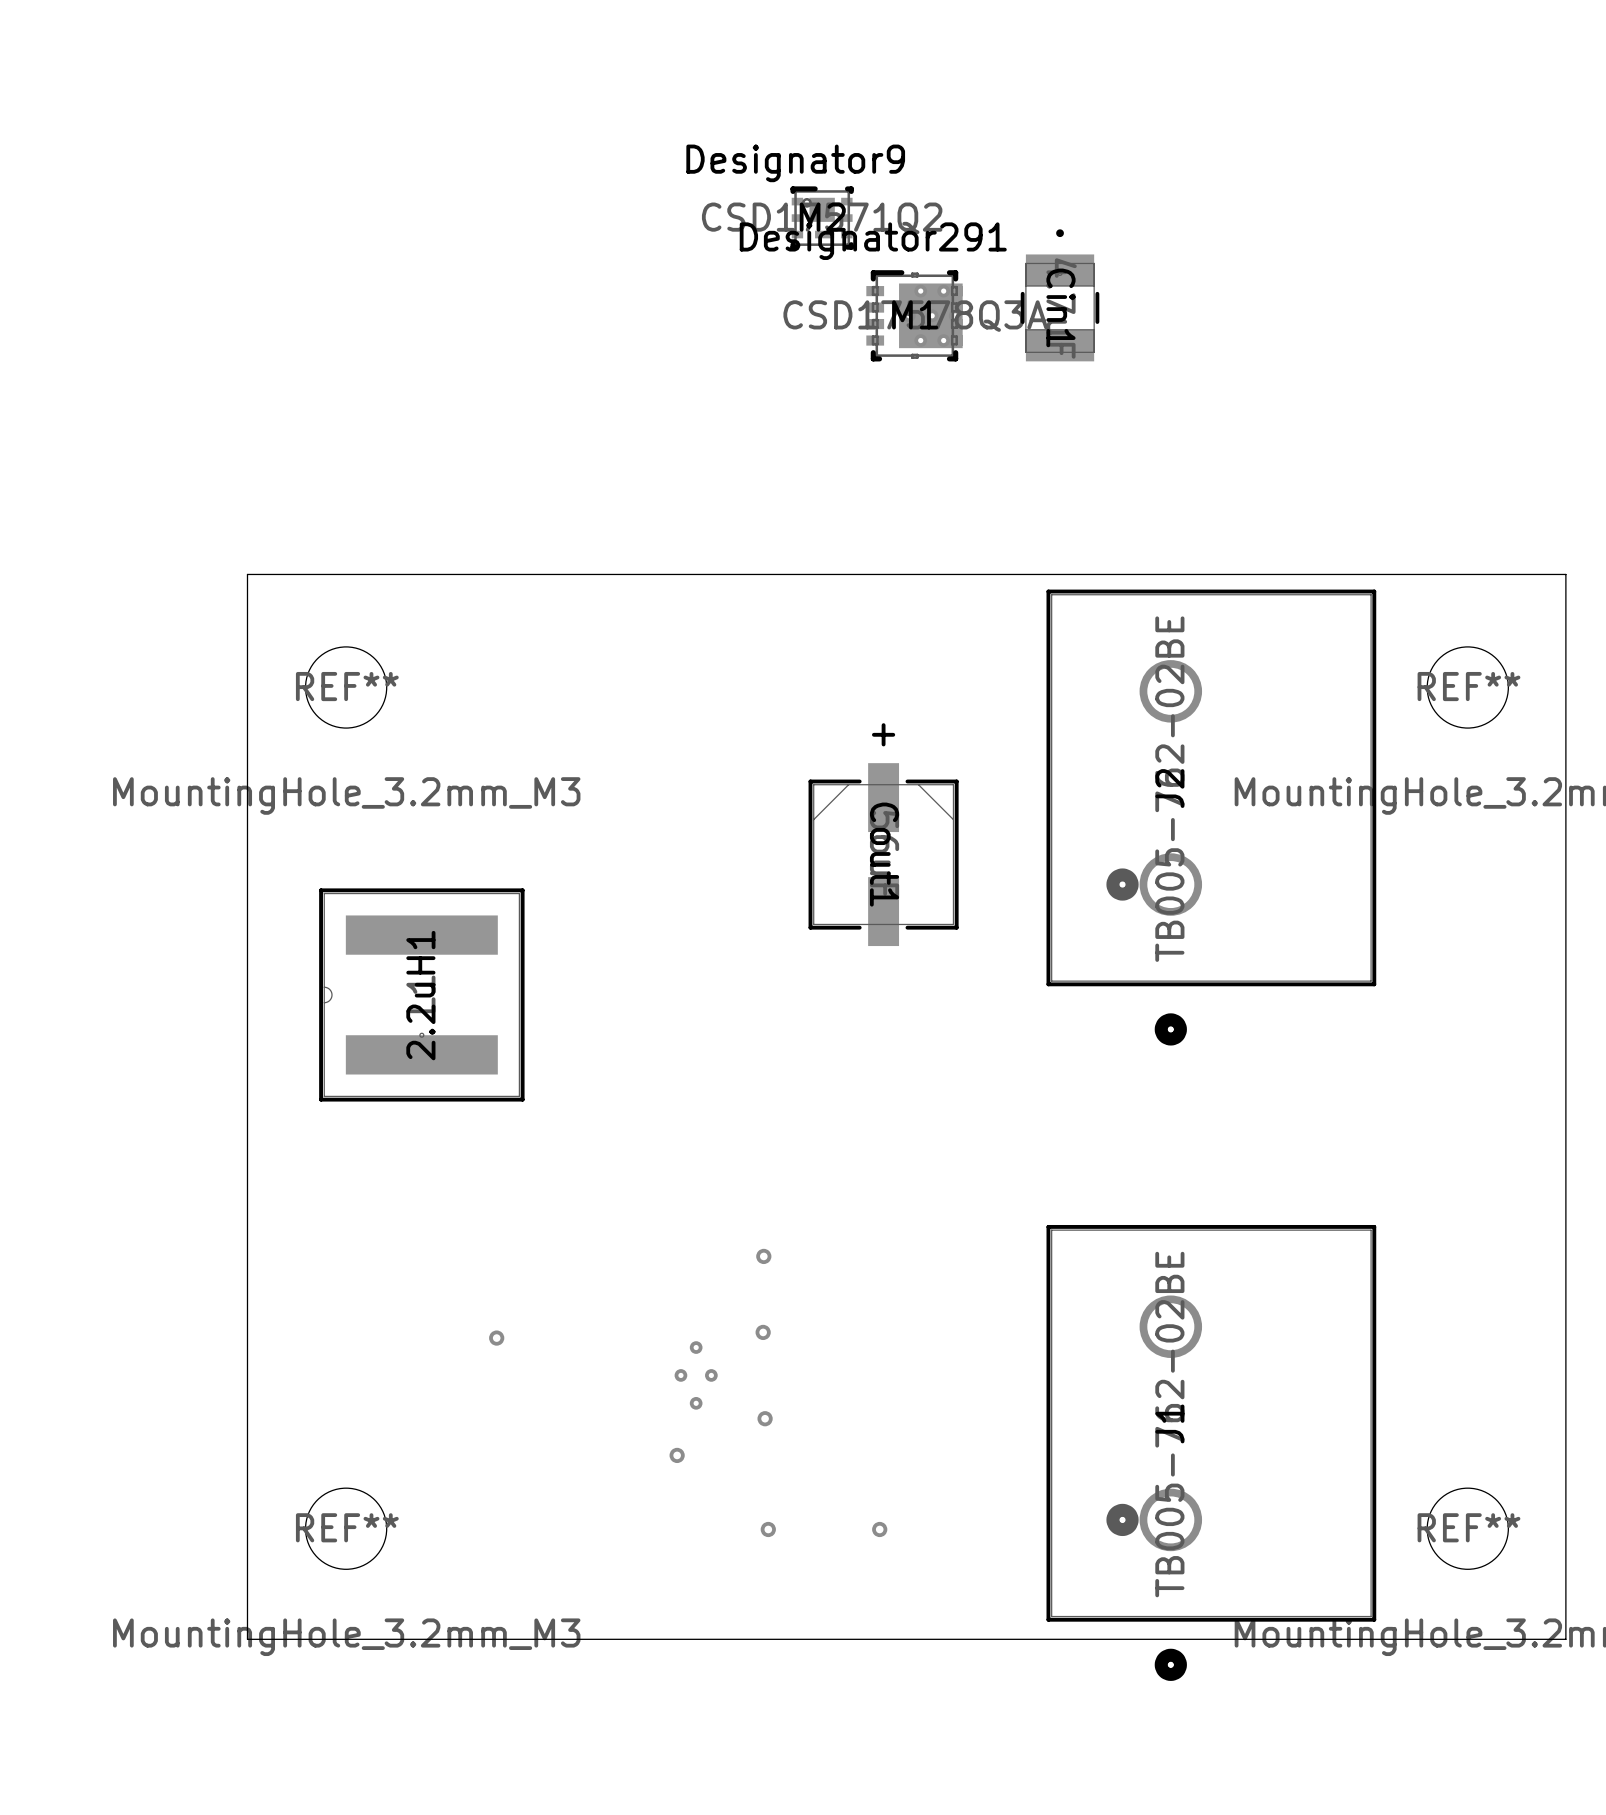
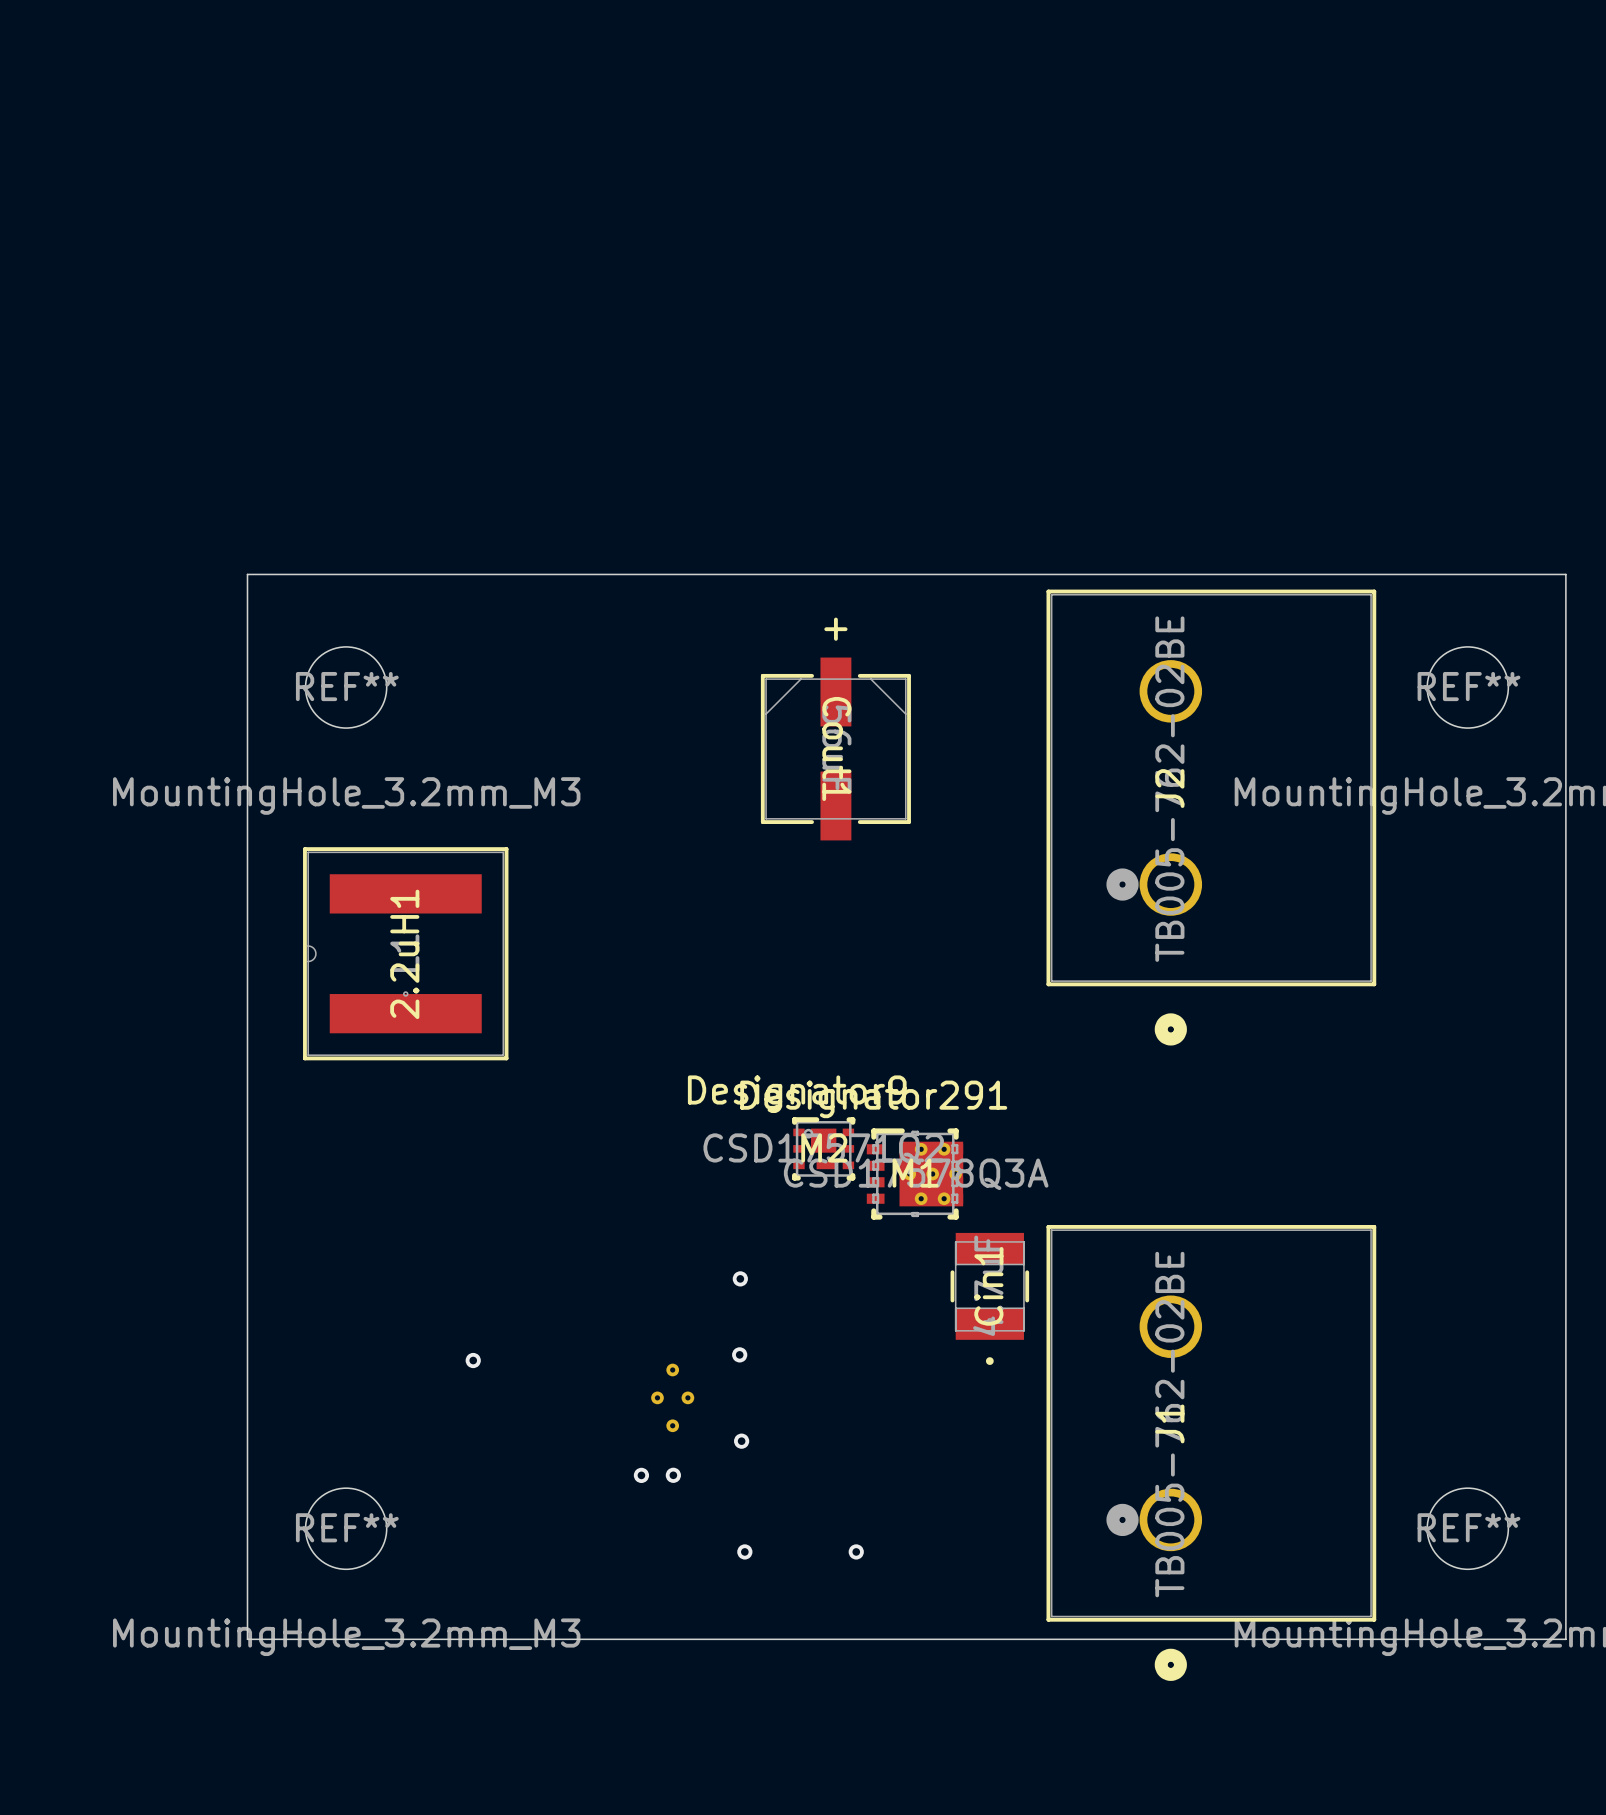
M2 position: (822, 218) -> (823, 1148)
Cin1 rotation: 0° (1060, 295) -> 180° (989, 1298)
Cin1 position: (1060, 295) -> (989, 1298)
M1 position: (914, 315) -> (914, 1174)
Cout1 position: (883, 834) -> (835, 729)
2.2uH1 position: (421, 994) -> (405, 953)
via: (763, 1256) -> none
via: none -> (740, 1278)
via: (763, 1332) -> none
via position: (496, 1338) -> (473, 1360)
via: none -> (739, 1354)
part position: (696, 1375) -> (672, 1397)
via position: (765, 1418) -> (741, 1441)
via: (677, 1455) -> none
via: none -> (641, 1475)
via: none -> (673, 1475)
via position: (768, 1529) -> (744, 1551)
via position: (879, 1529) -> (856, 1551)

